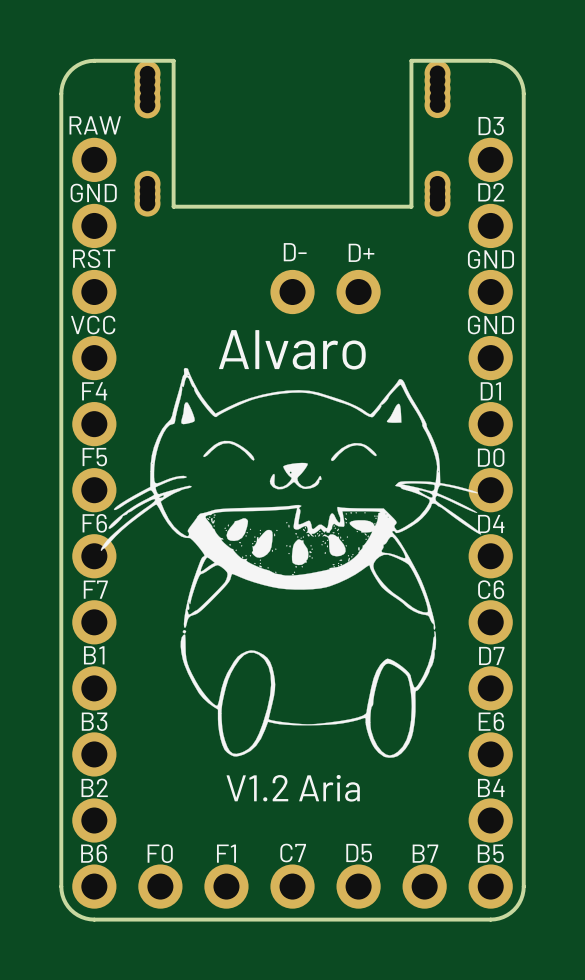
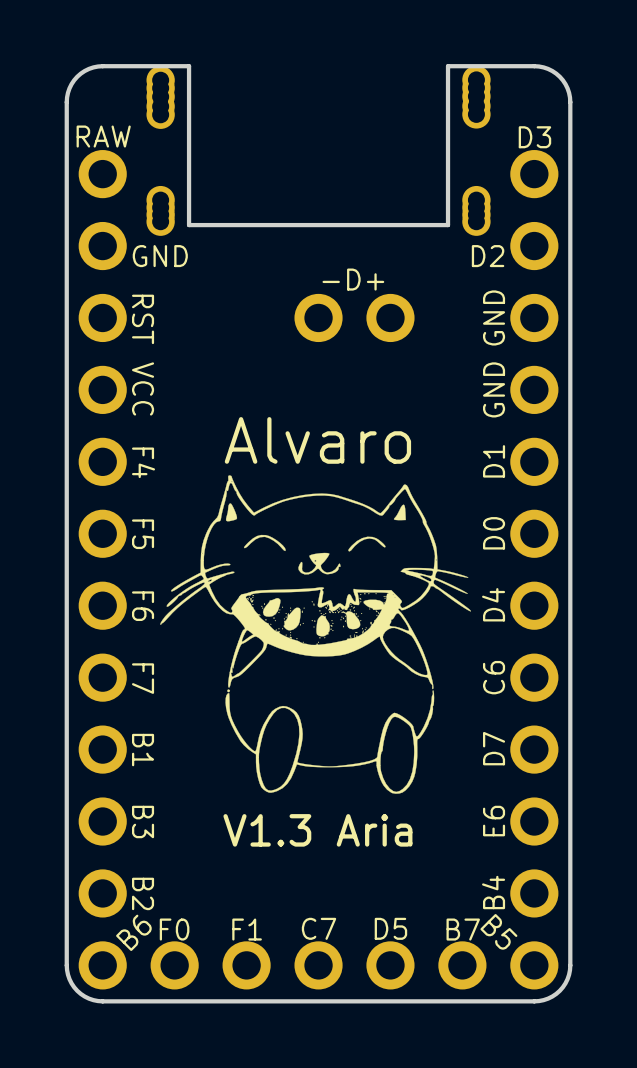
text position: D2 (491, 192) -> D2 (488, 256)
text position: GND (93, 193) -> GND (160, 256)
text: D- (295, 252) -> none
text: D+ (361, 252) -> -D+ (353, 279)
text rotation: 0° (94, 258) -> 90° clockwise (143, 319)
text: GND (490, 259) -> none
text: none -> GND (494, 317)
text rotation: 0° (93, 325) -> 90° clockwise (143, 388)
text: GND (490, 325) -> none
text position: Alvaro (292, 349) -> Alvaro (317, 440)
text: none -> GND (494, 389)
drawing shape: [100, 367, 482, 758] -> [160, 475, 471, 794]
text rotation: 0° (94, 391) -> 90° clockwise (143, 462)
text position: F4 (94, 391) -> F4 (143, 462)
text rotation: 0° (490, 391) -> 90° counterclockwise (494, 461)
text position: D1 (490, 391) -> D1 (494, 461)
text rotation: 0° (94, 457) -> 90° clockwise (143, 534)
text position: F5 (94, 457) -> F5 (143, 534)
text rotation: 0° (491, 457) -> 90° counterclockwise (494, 533)
text position: D0 (491, 457) -> D0 (494, 533)
text rotation: 0° (94, 523) -> 90° clockwise (143, 606)
text position: F6 (94, 523) -> F6 (143, 606)
text rotation: 0° (491, 523) -> 90° counterclockwise (493, 604)
text position: D4 (491, 523) -> D4 (493, 604)
text rotation: 0° (95, 589) -> 90° clockwise (143, 678)
text position: F7 (95, 589) -> F7 (143, 678)
text rotation: 0° (491, 589) -> 90° counterclockwise (494, 677)
text position: C6 (491, 589) -> C6 (494, 677)
text rotation: 0° (94, 655) -> 90° clockwise (143, 750)
text position: B1 (94, 655) -> B1 (143, 750)
text rotation: 0° (491, 655) -> 90° counterclockwise (494, 748)
text position: D7 (491, 655) -> D7 (494, 748)
text rotation: 0° (94, 721) -> 90° clockwise (143, 821)
text position: B3 (94, 721) -> B3 (143, 821)
text rotation: 0° (491, 721) -> 90° counterclockwise (494, 821)
text position: E6 (491, 721) -> E6 (494, 821)
text rotation: 0° (94, 787) -> 90° clockwise (143, 893)
text position: B2 (94, 787) -> B2 (143, 893)
text rotation: 0° (491, 787) -> 90° counterclockwise (493, 892)
text position: B4 (491, 787) -> B4 (493, 892)
text: V1.2 Aria (293, 788) -> V1.3 Aria (317, 830)
text rotation: 0° (94, 853) -> 45° counterclockwise (133, 932)
text rotation: 0° (490, 853) -> 45° clockwise (498, 931)

